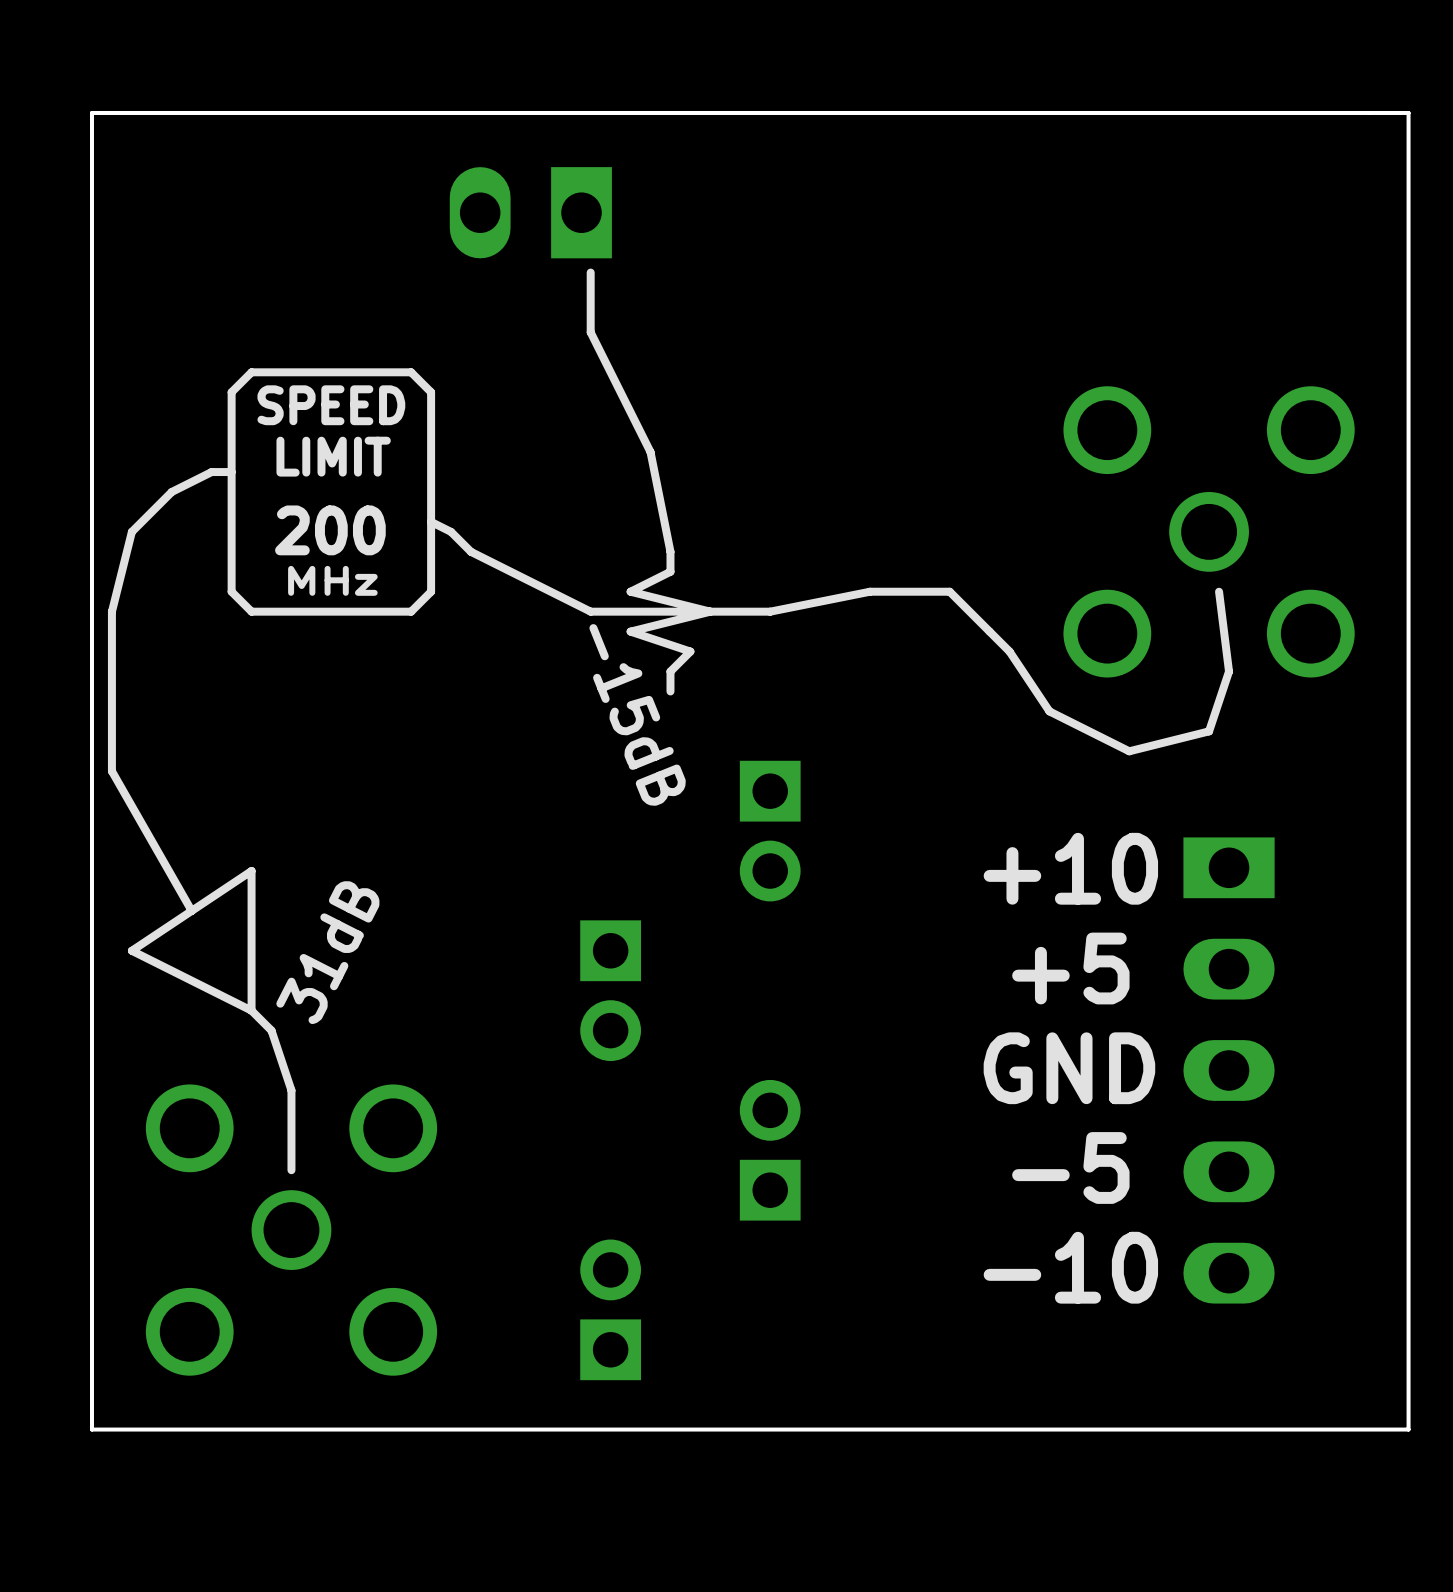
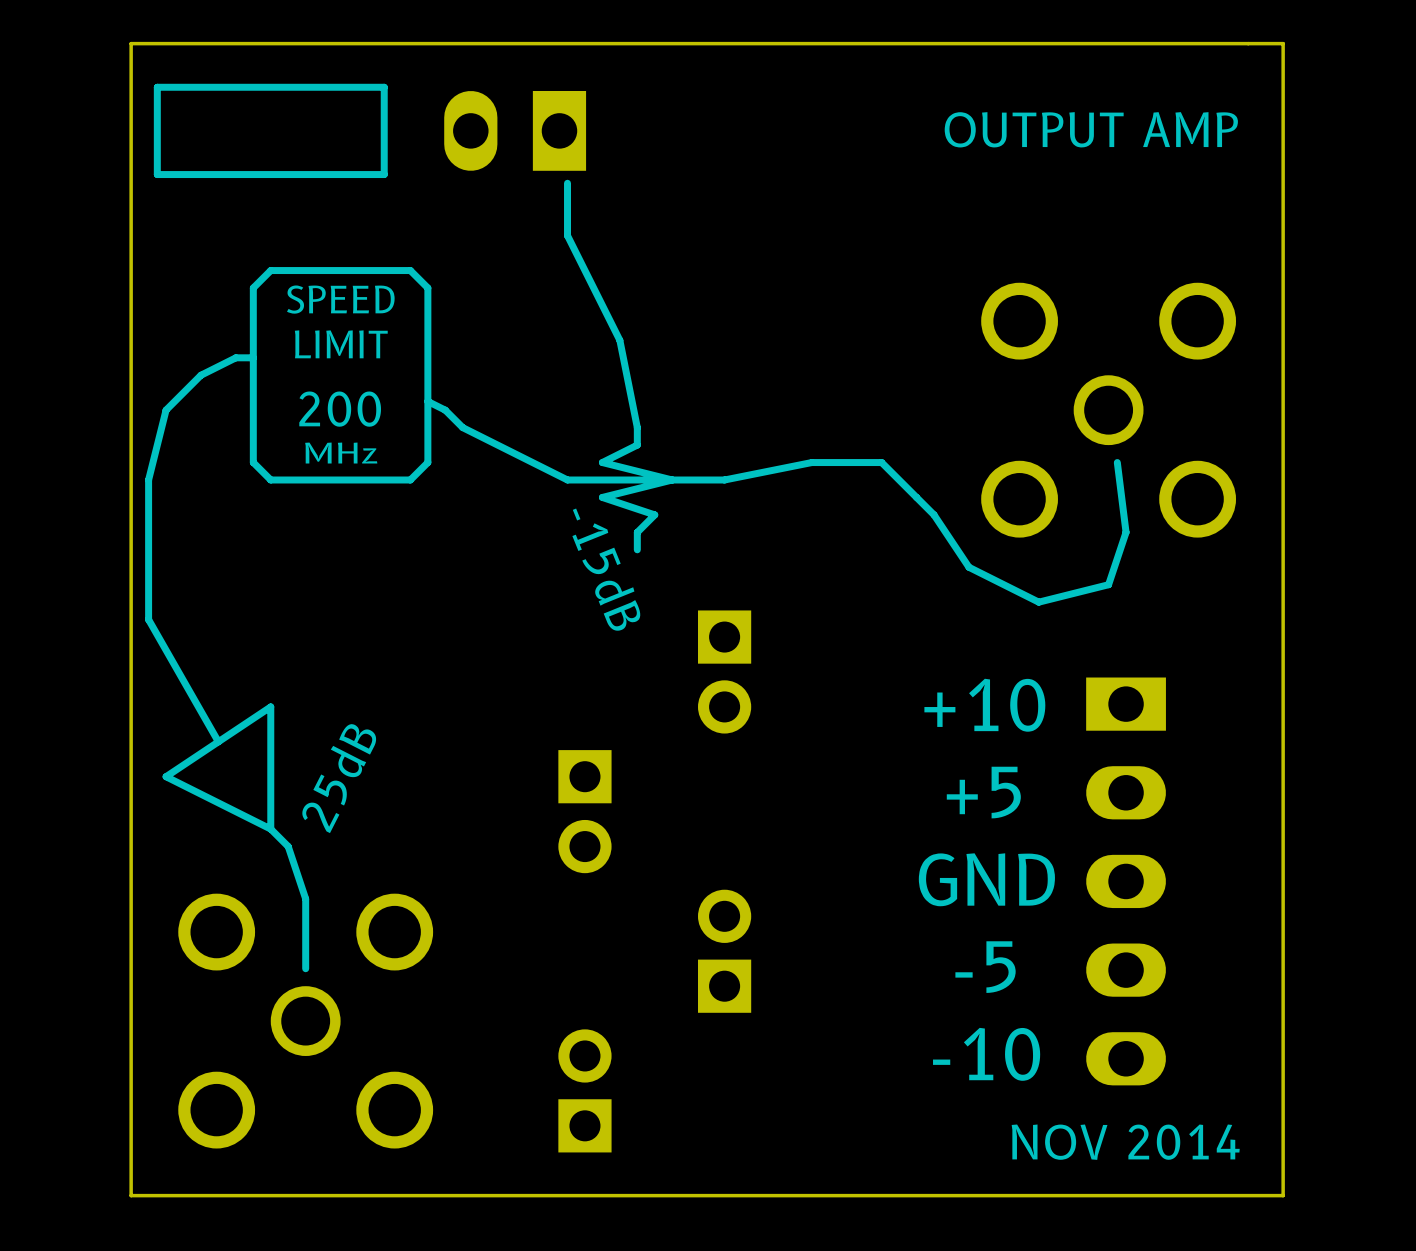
line: none -> (384, 87) (157, 87) (157, 174) (384, 174) (384, 87)
text: none -> OUTPUT AMP (1091, 129)
text: 31dB (327, 952) -> 25dB (339, 778)
text: none -> NOV 2014 (1125, 1142)

